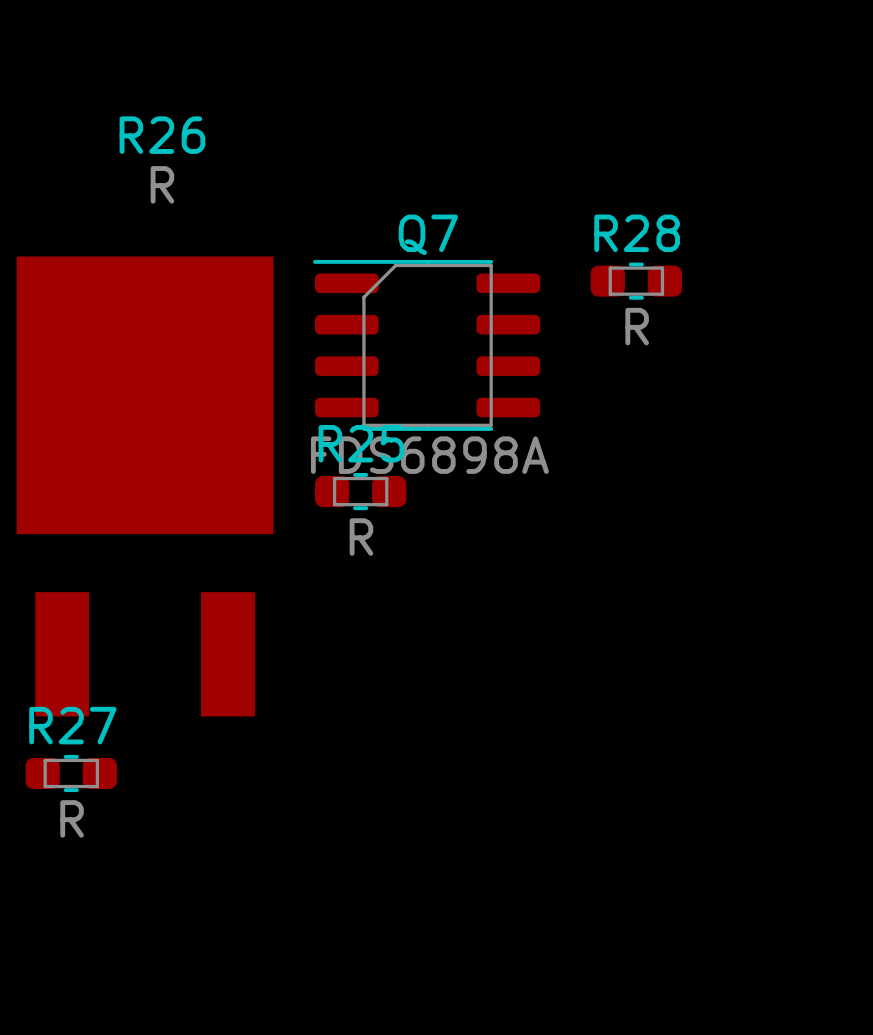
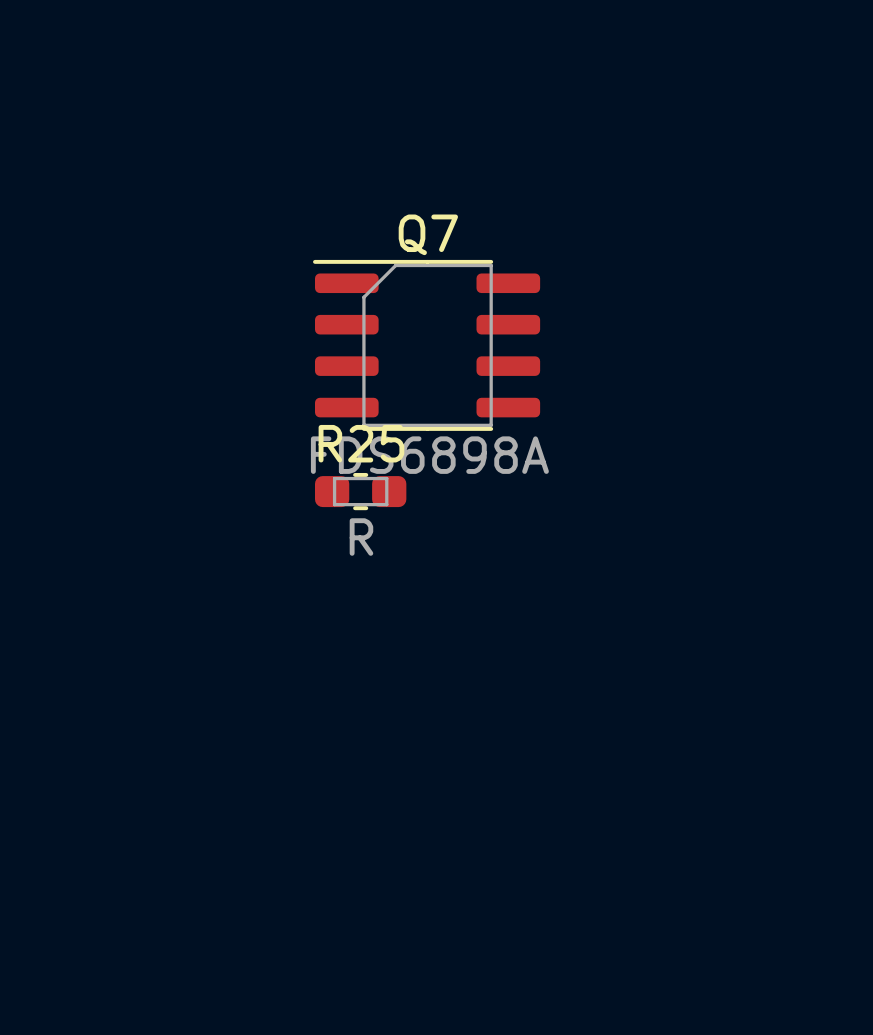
R28: R (636, 281) -> none
R26: R (145, 486) -> none
R27: R (71, 773) -> none

